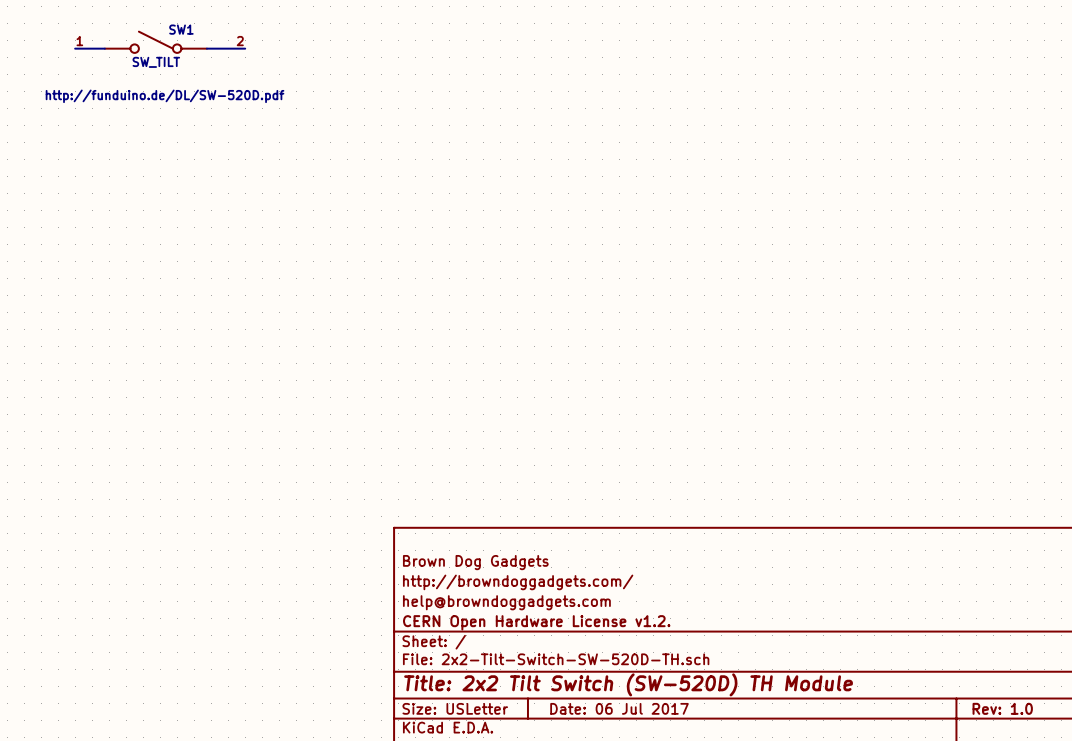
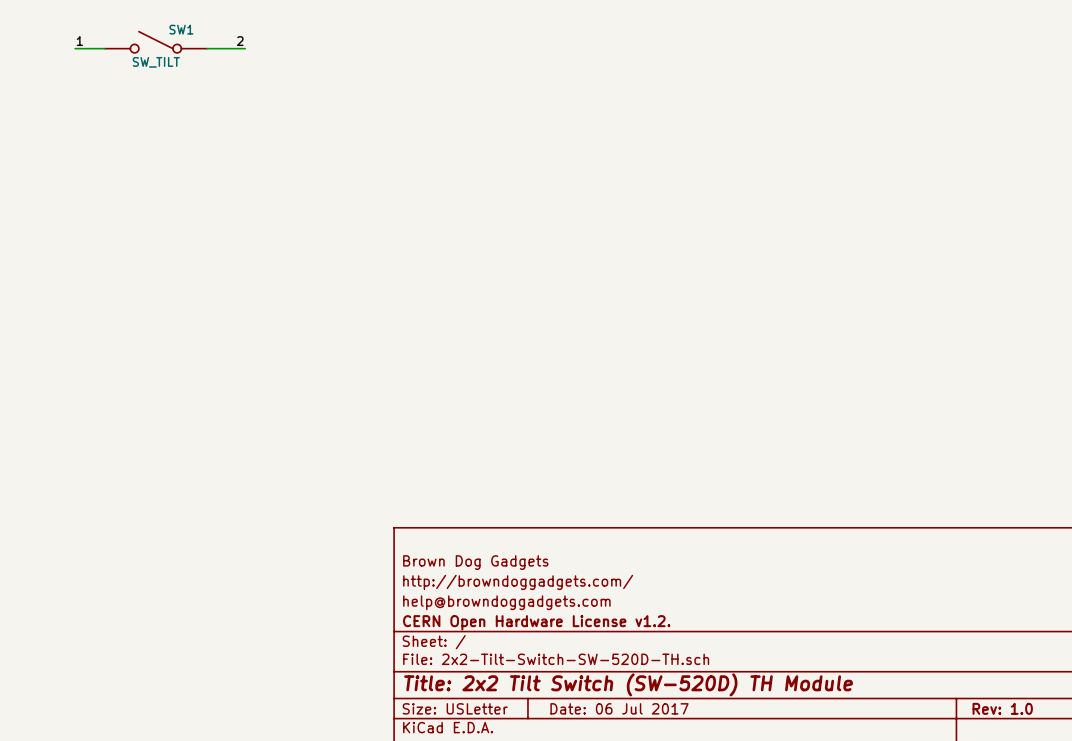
SW1 text: http://funduino.de/DL/SW-520D.pdf (165, 96) -> none

